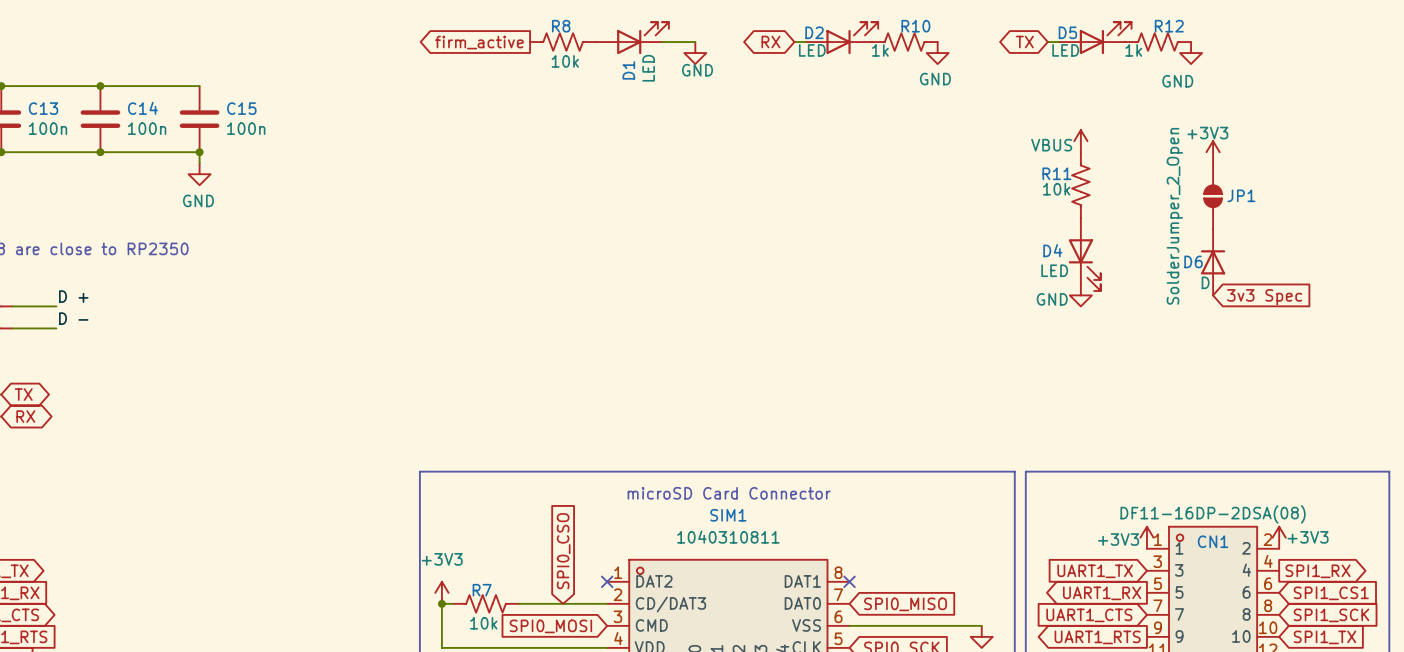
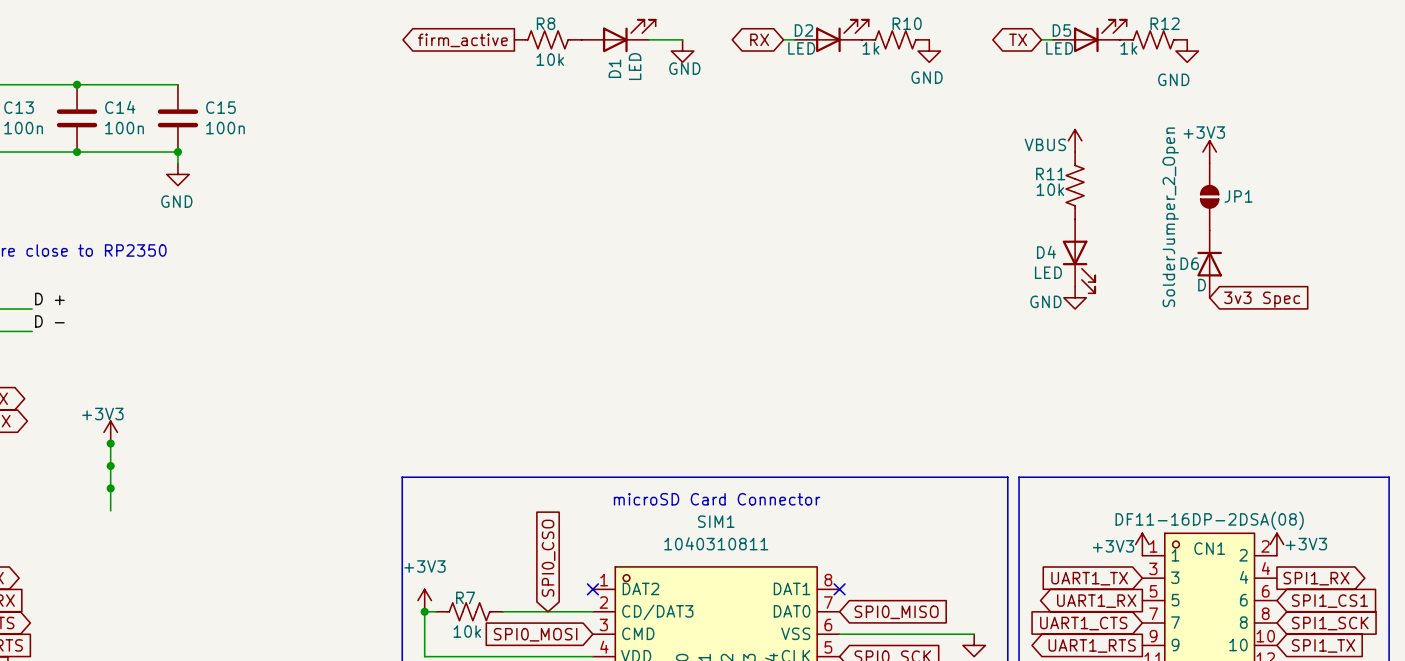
power symbol: none -> +3V3 (110, 432)
wire: none -> (110, 443) (110, 510)
junction: none -> (110, 443)
junction: none -> (110, 466)
junction: none -> (110, 488)

